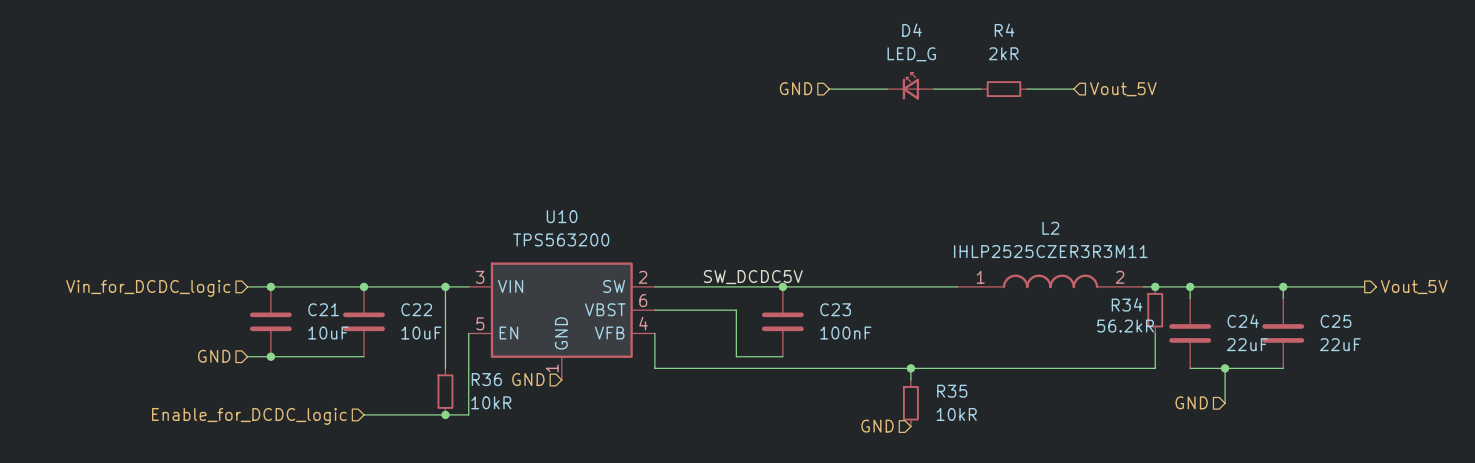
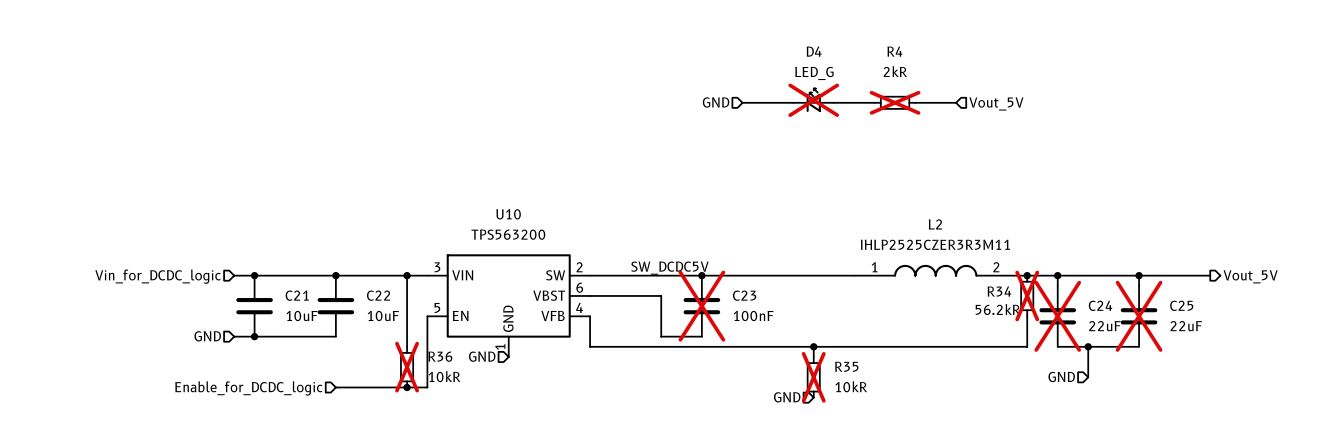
D4 do-not-place cross: none -> (813, 100)
R4 do-not-place cross: none -> (895, 102)
R34 do-not-place cross: none -> (1027, 295)
C23 do-not-place cross: none -> (701, 306)
C24 do-not-place cross: none -> (1057, 316)
C25 do-not-place cross: none -> (1139, 316)
R36 do-not-place cross: none -> (407, 367)
R35 do-not-place cross: none -> (813, 377)

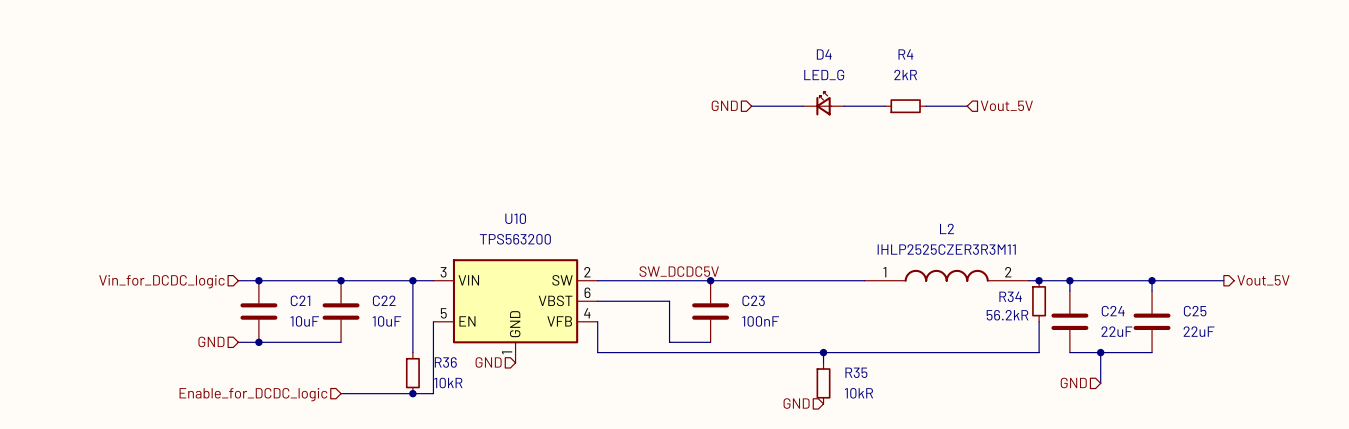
D4 do-not-place cross: (813, 100) -> none
R4 do-not-place cross: (895, 102) -> none
R34 do-not-place cross: (1027, 295) -> none
C23 do-not-place cross: (701, 306) -> none
C24 do-not-place cross: (1057, 316) -> none
C25 do-not-place cross: (1139, 316) -> none
R36 do-not-place cross: (407, 367) -> none
R35 do-not-place cross: (813, 377) -> none

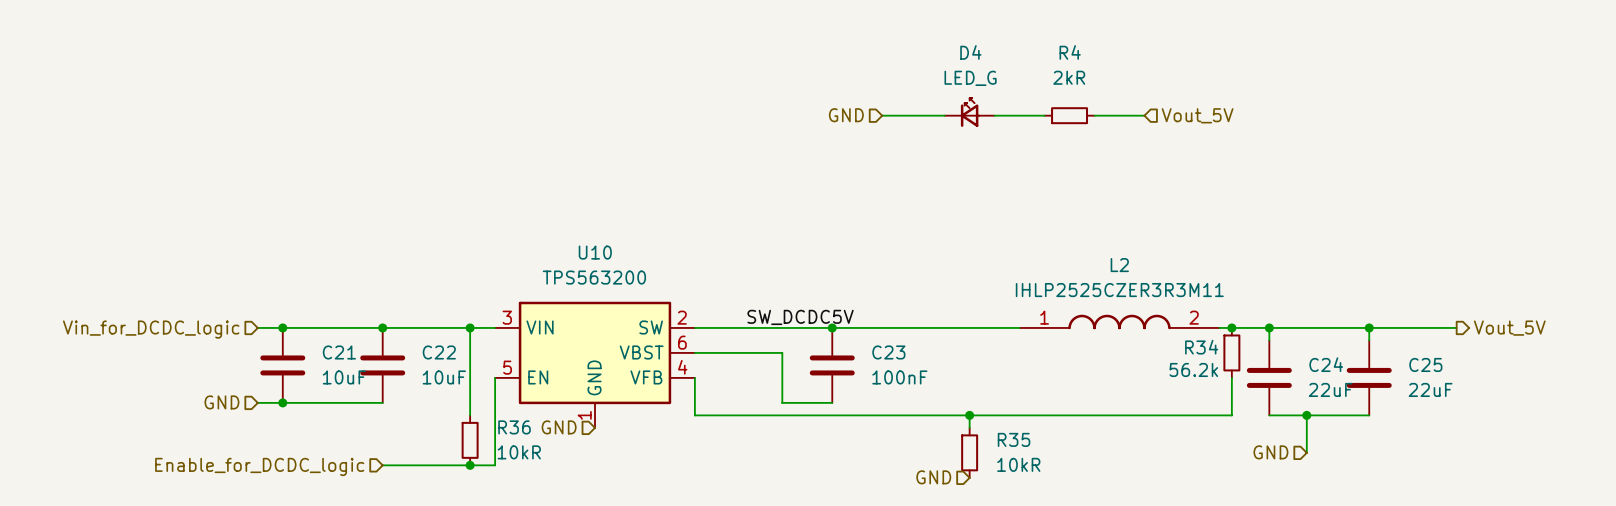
R34 value: 56.2kR (1007, 315) -> 56.2k (1193, 369)

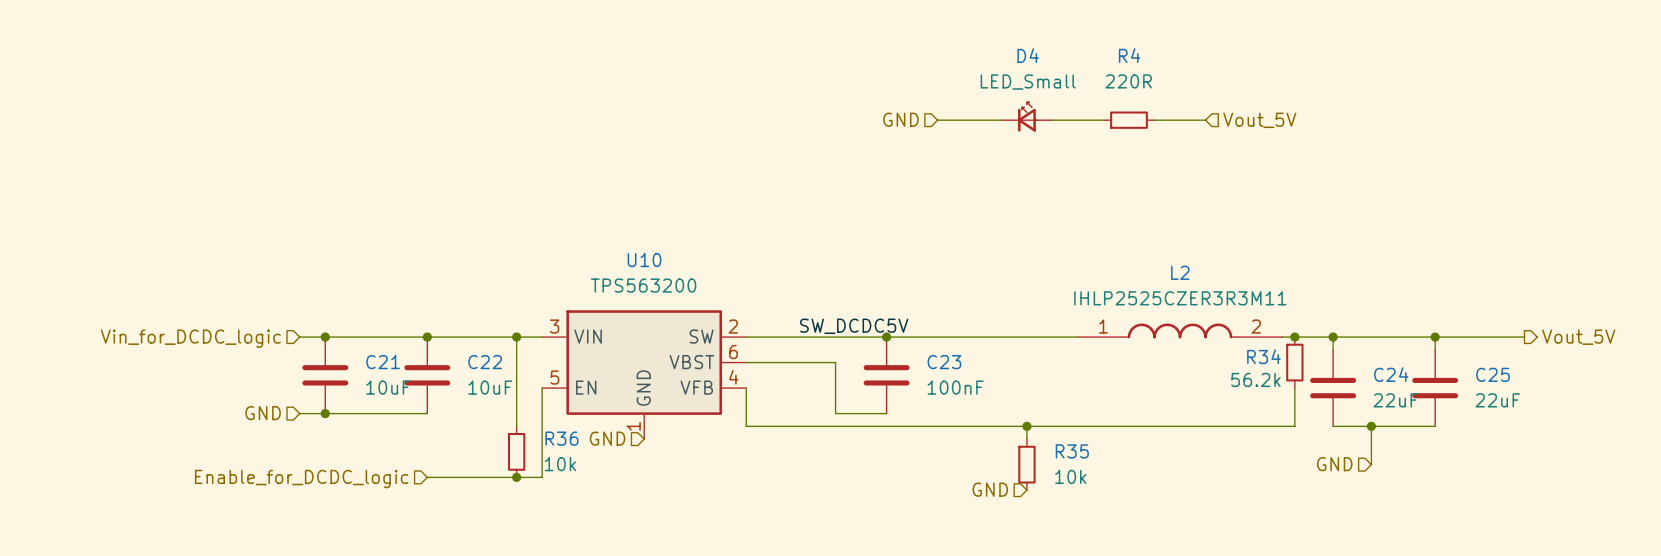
R4 value: 2kR (1069, 77) -> 220R (1128, 81)
D4 value: LED_G (970, 78) -> LED_Small (1028, 82)
R36 value: 10kR (519, 452) -> 10k (560, 464)
R35 value: 10kR (1018, 464) -> 10k (1070, 476)

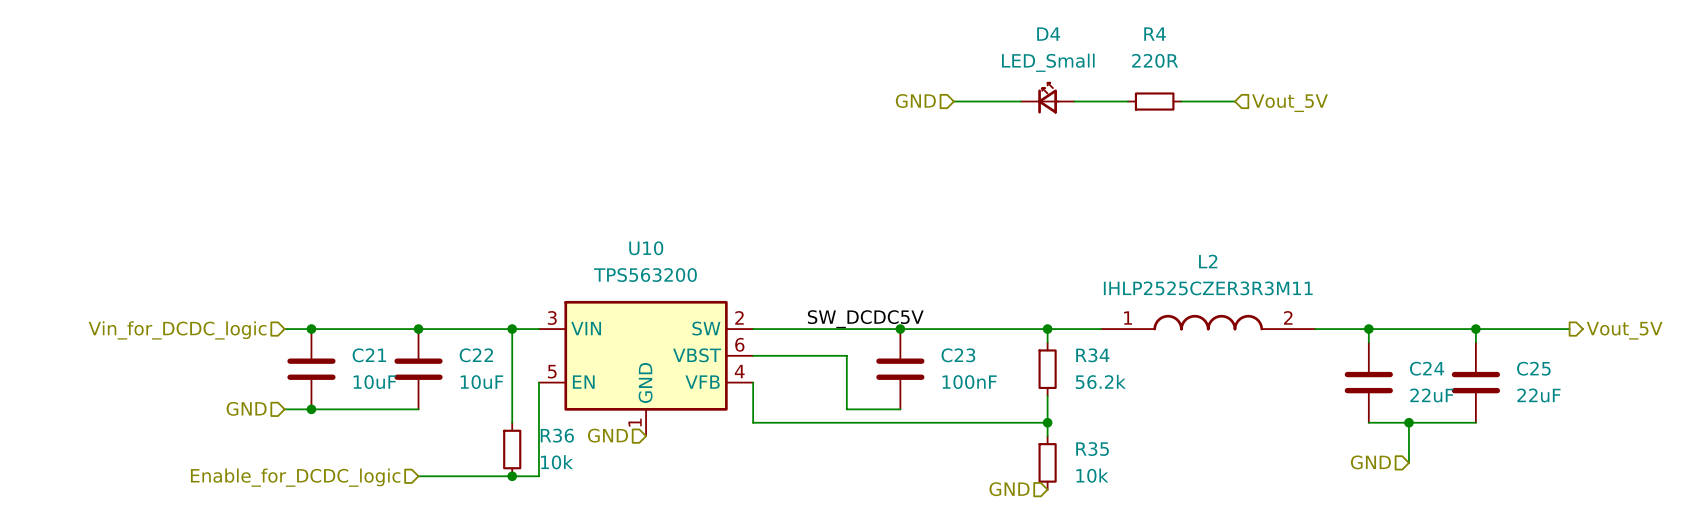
wire: none -> (1047, 329) (1047, 342)
junction: none -> (1047, 329)
junction: (1294, 337) -> none
R34 name position: R34 (1263, 356) -> R34 (1092, 355)
R34 position: (1294, 362) -> (1047, 369)
R34 value position: 56.2k (1255, 379) -> 56.2k (1100, 381)
wire: (1294, 388) (1294, 426) (1026, 426) -> (1047, 395) (1047, 422)

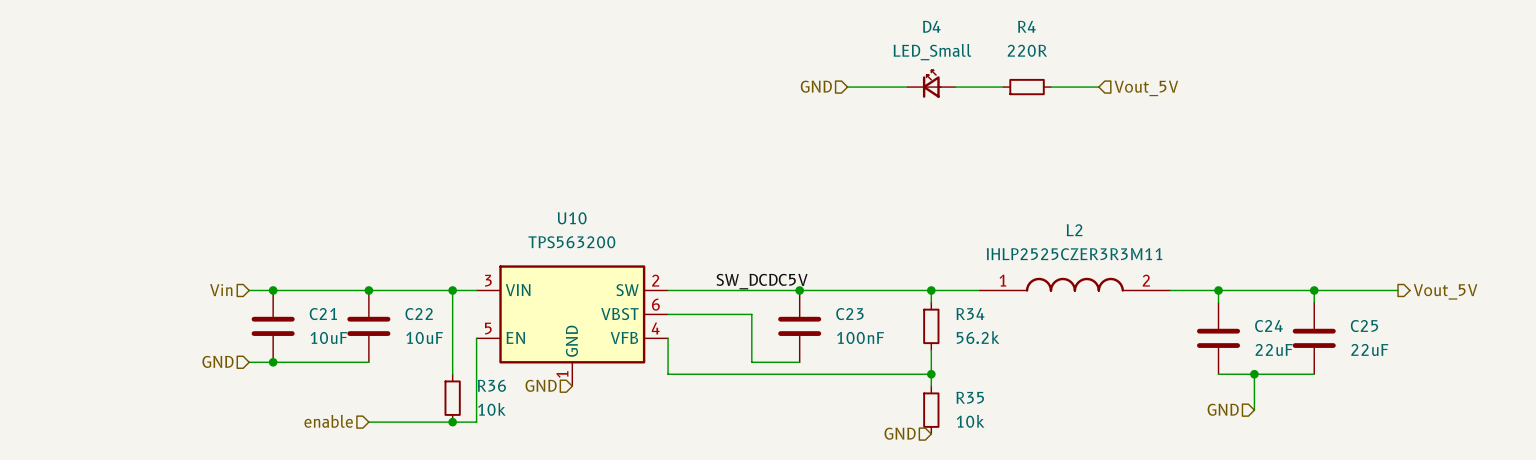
hierarchical label: Vin_for_DCDC_logic (177, 330) -> Vin (221, 290)
hierarchical label: Enable_for_DCDC_logic (295, 477) -> enable (328, 421)

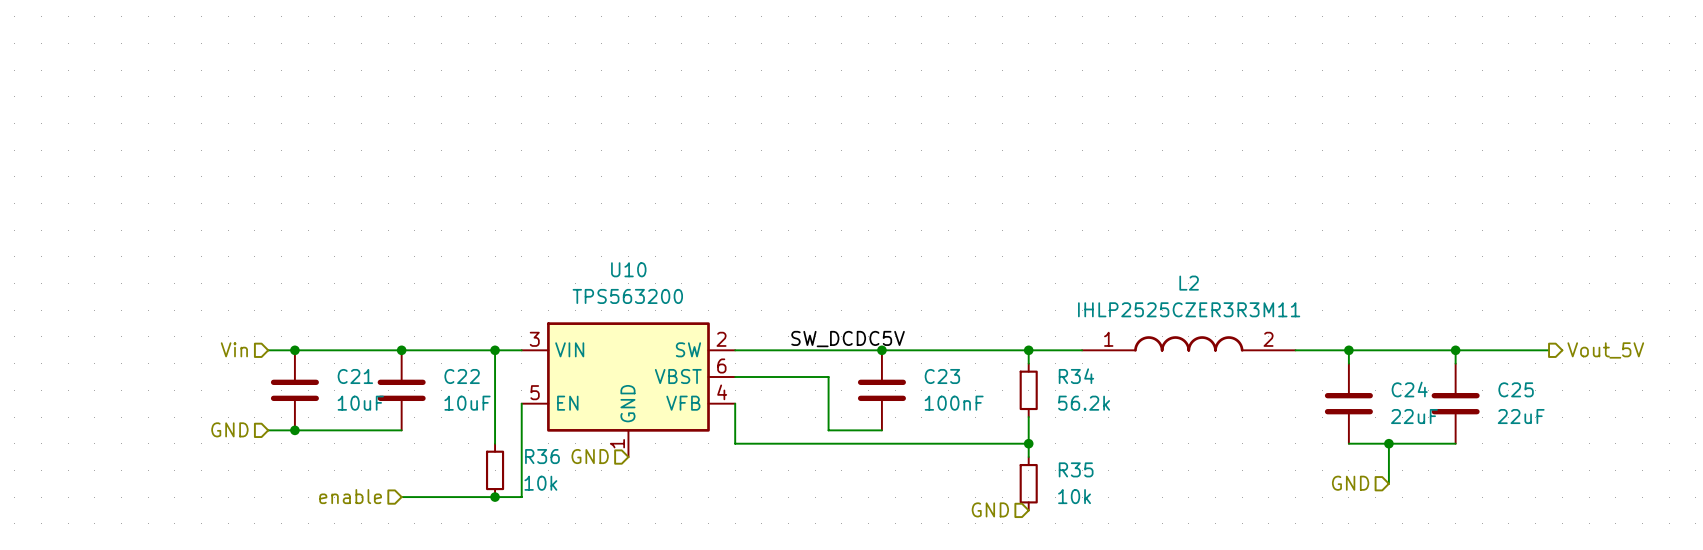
D4: LED_Small (931, 84) -> none
hierarchical label: GND (816, 86) -> none
wire: (847, 87) (907, 87) -> none
wire: (955, 87) (1003, 87) -> none
R4: 220R (1027, 87) -> none
wire: (1050, 87) (1098, 87) -> none
hierarchical label: Vout_5V (1146, 88) -> none

